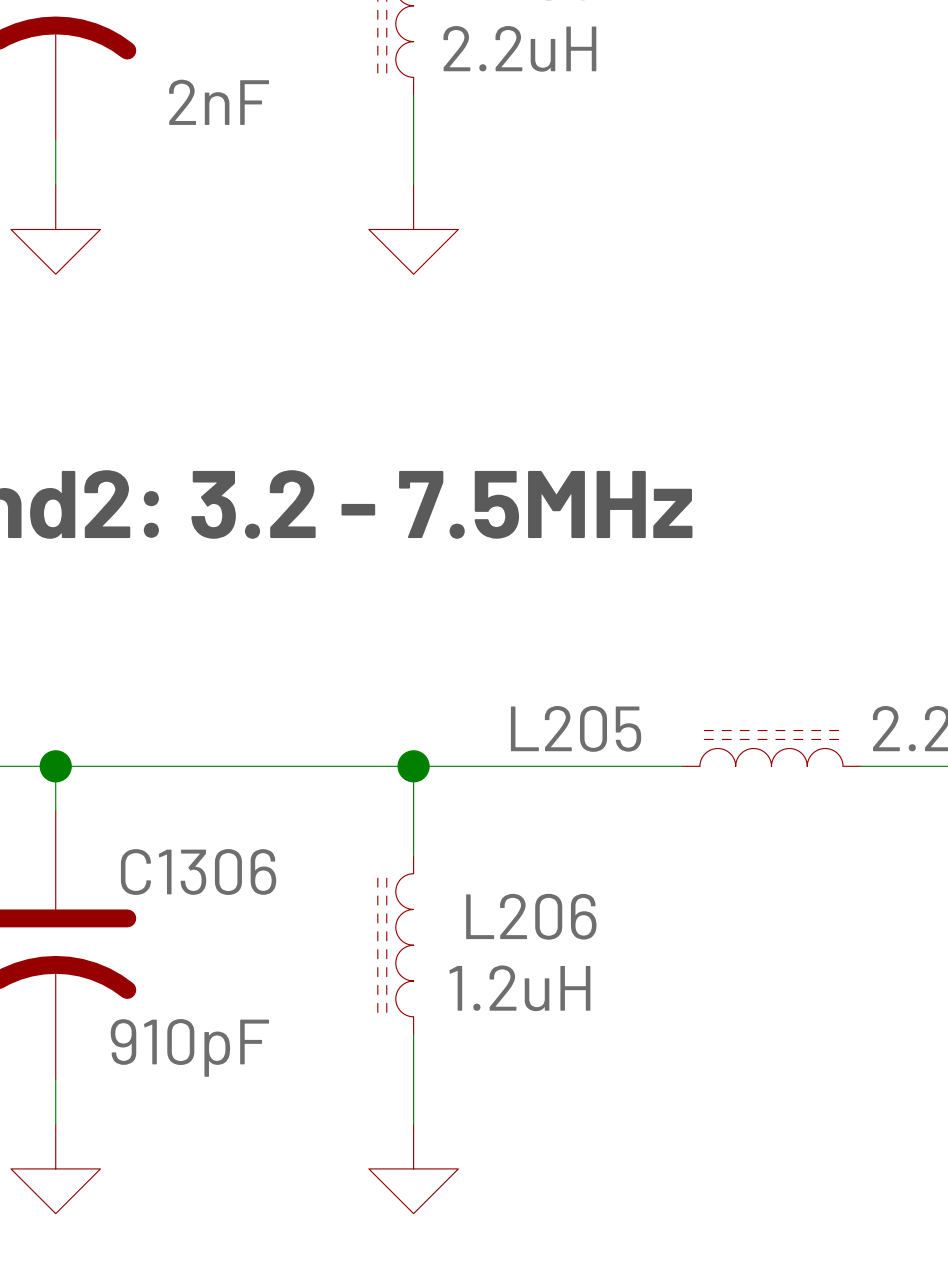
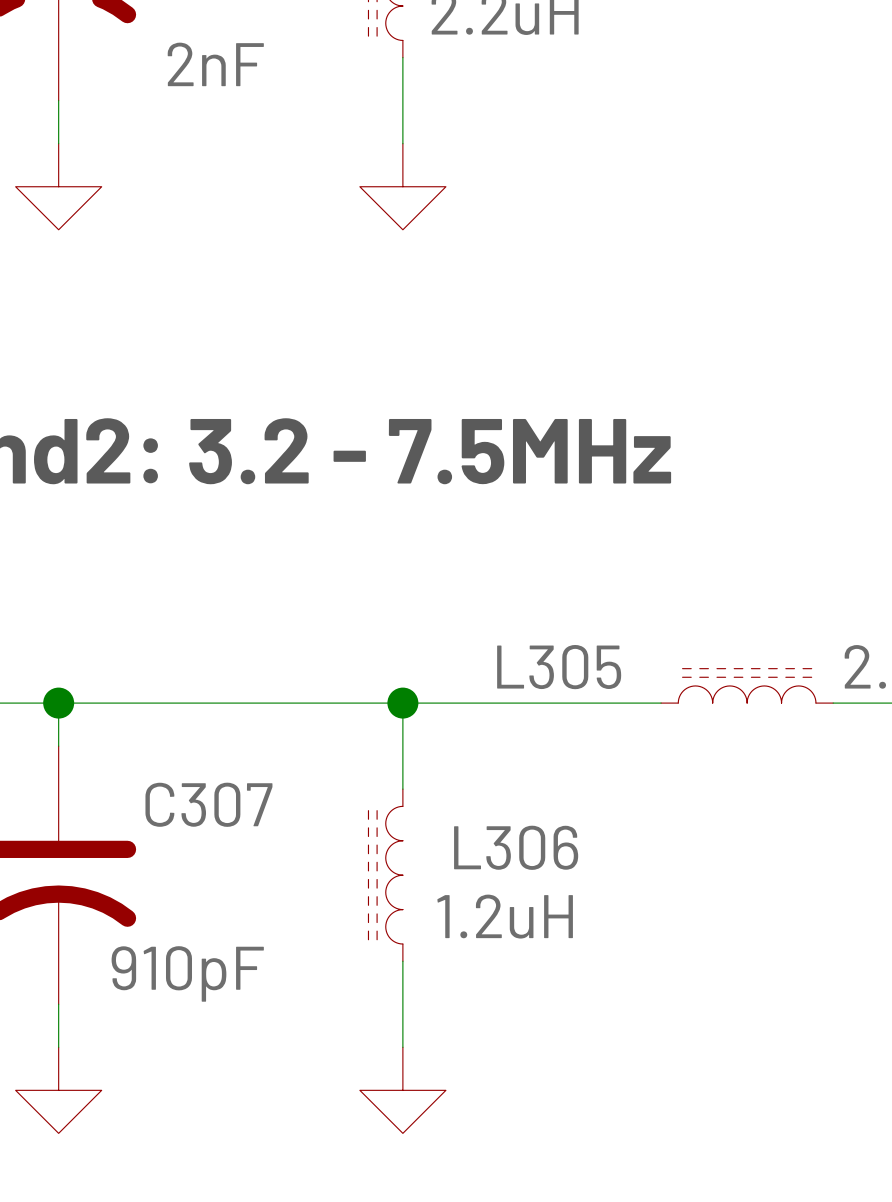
L205 name: L205 (576, 728) -> L305 (559, 667)
C1306 name: C1306 (198, 872) -> C307 (208, 804)
L206 name: L206 (531, 916) -> L306 (516, 847)

